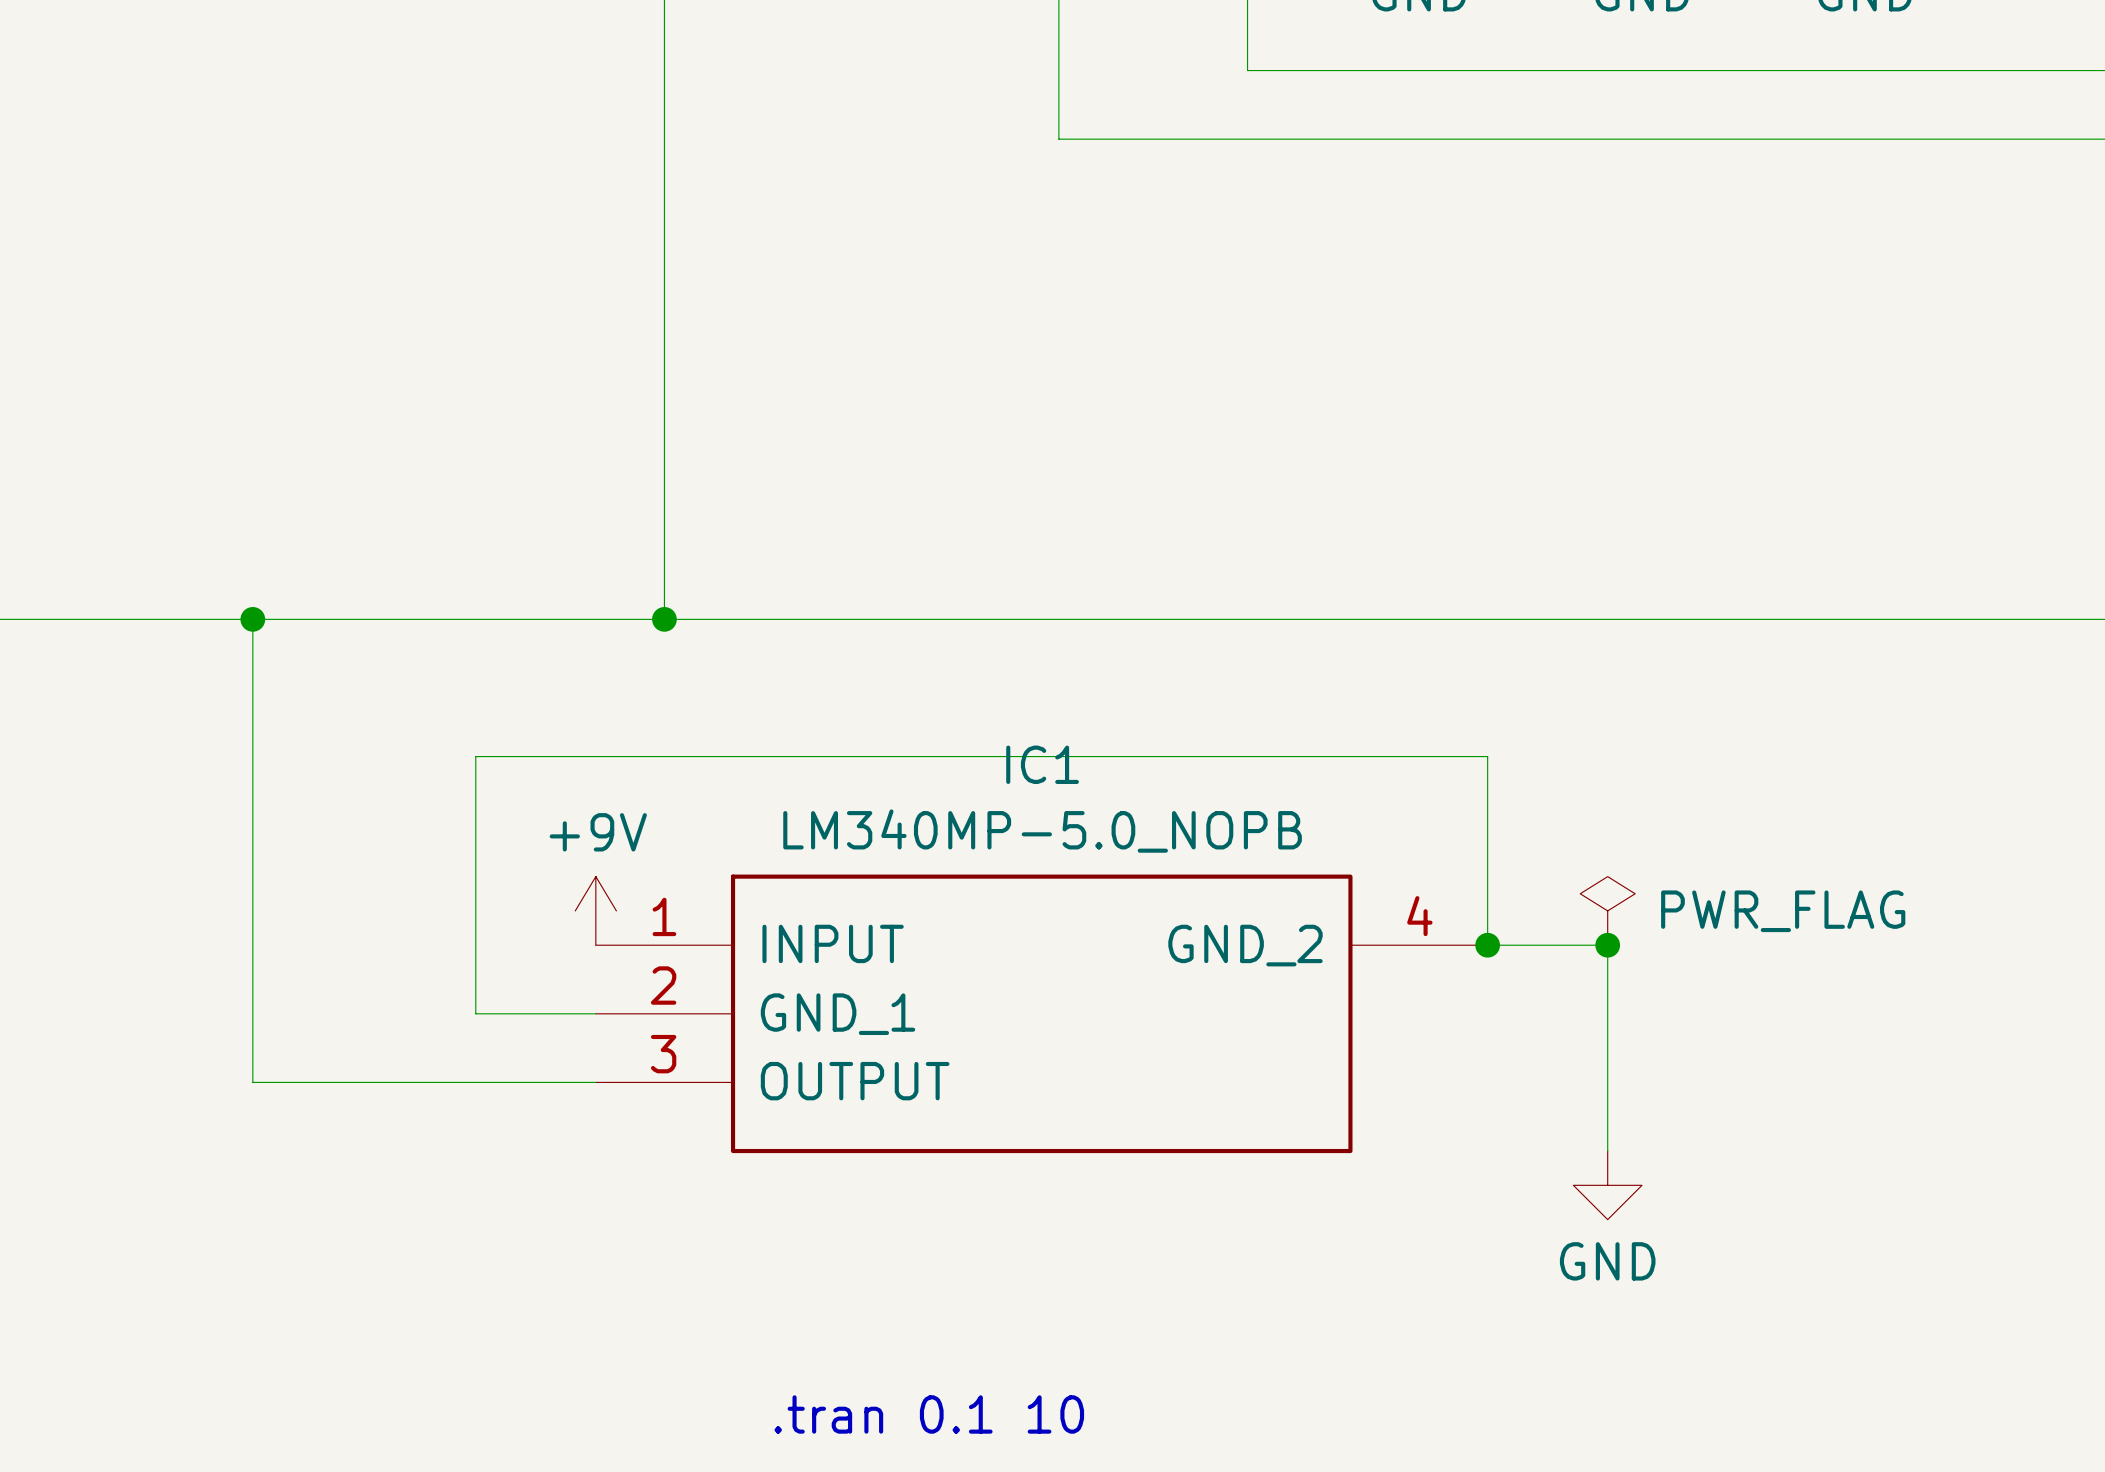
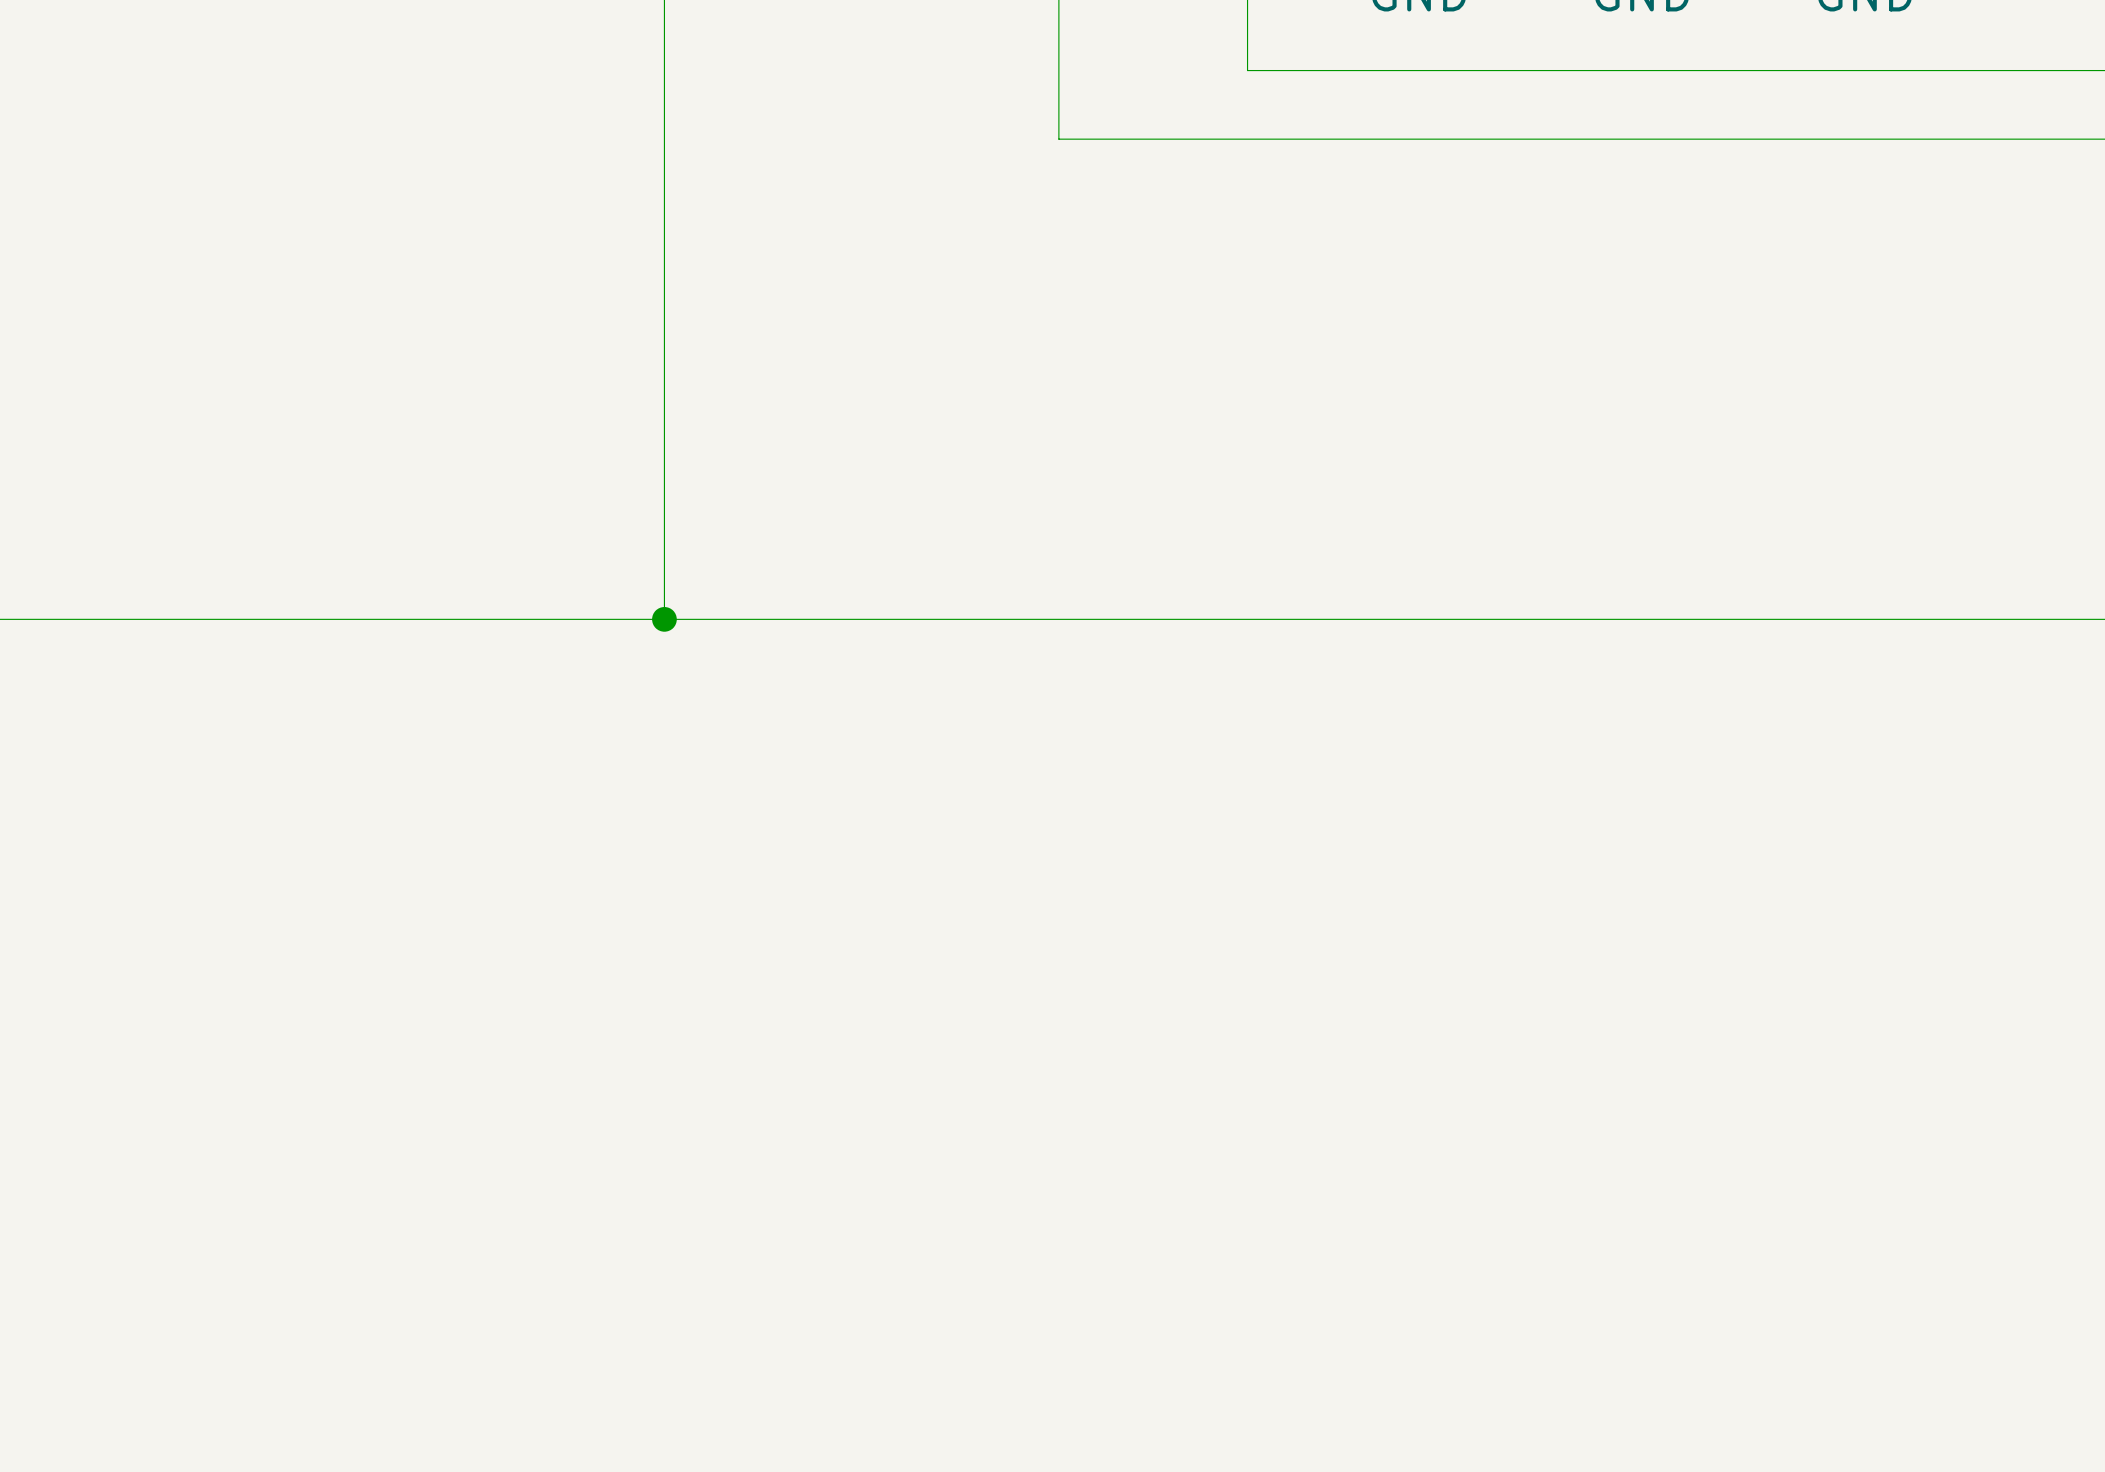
wire: (252, 619) (252, 1082) (595, 1082) -> none
junction: (252, 619) -> none
power symbol: +9V (595, 910) -> none
power symbol: PWR_FLAG (1607, 910) -> none
junction: (1487, 945) -> none
junction: (1607, 945) -> none
wire: (595, 1013) (475, 1013) (475, 756) (1487, 756) (1487, 945) (1607, 945) (1607, 1151) -> none
IC1: LM340MP-5.0_NOPB (1041, 1013) -> none
power symbol: GND (1607, 1185) -> none
text: .tran 0.1 10 (929, 1414) -> none

